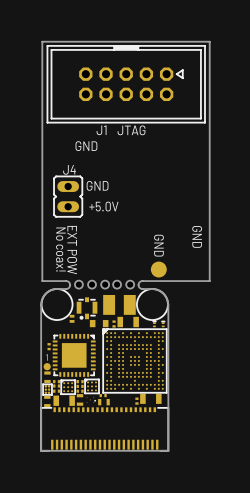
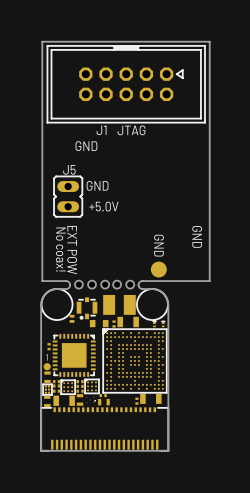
J4 name: J4 (69, 169) -> J5 (69, 169)

